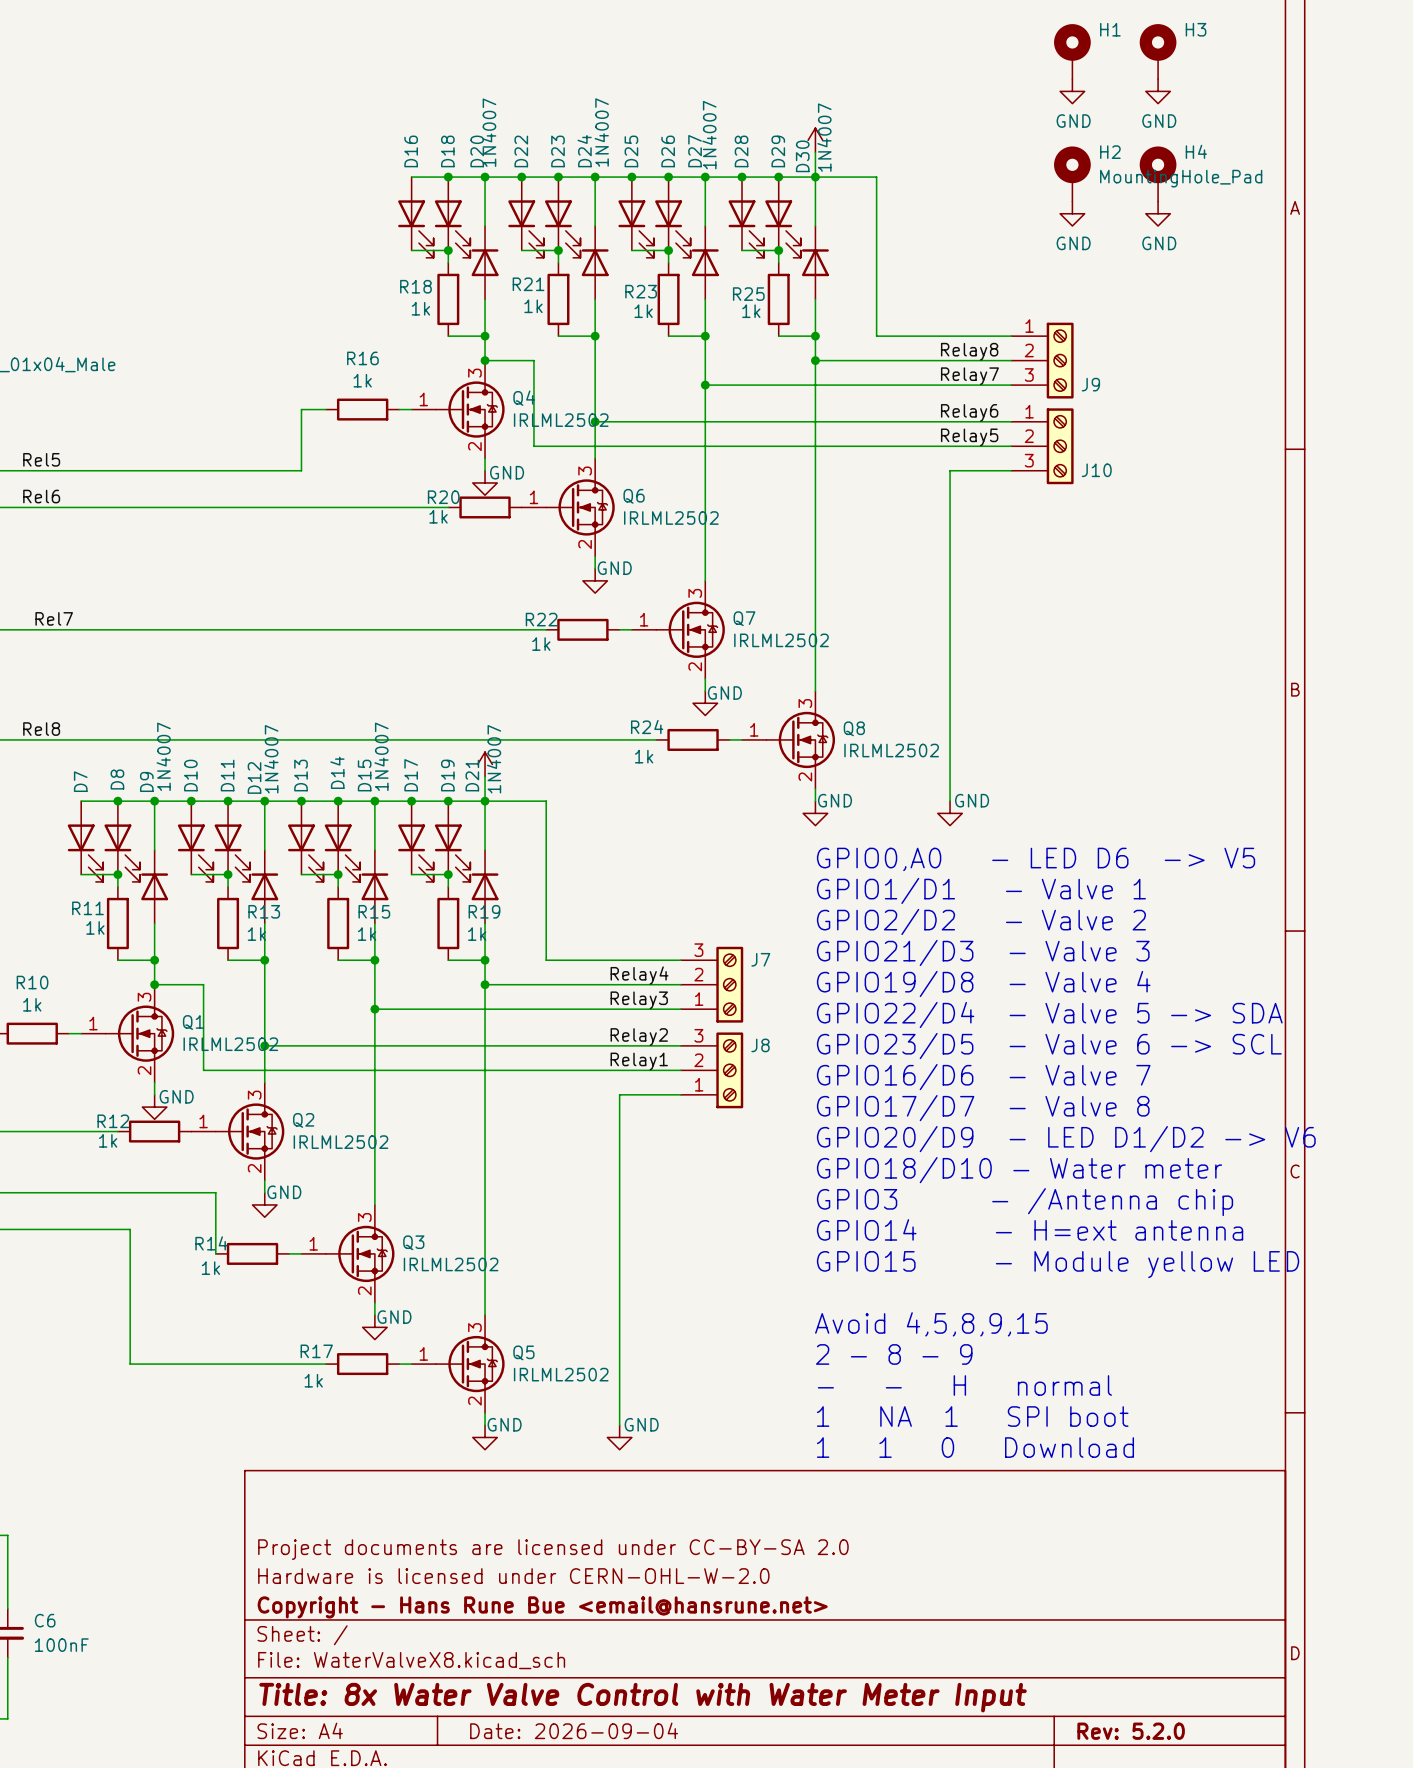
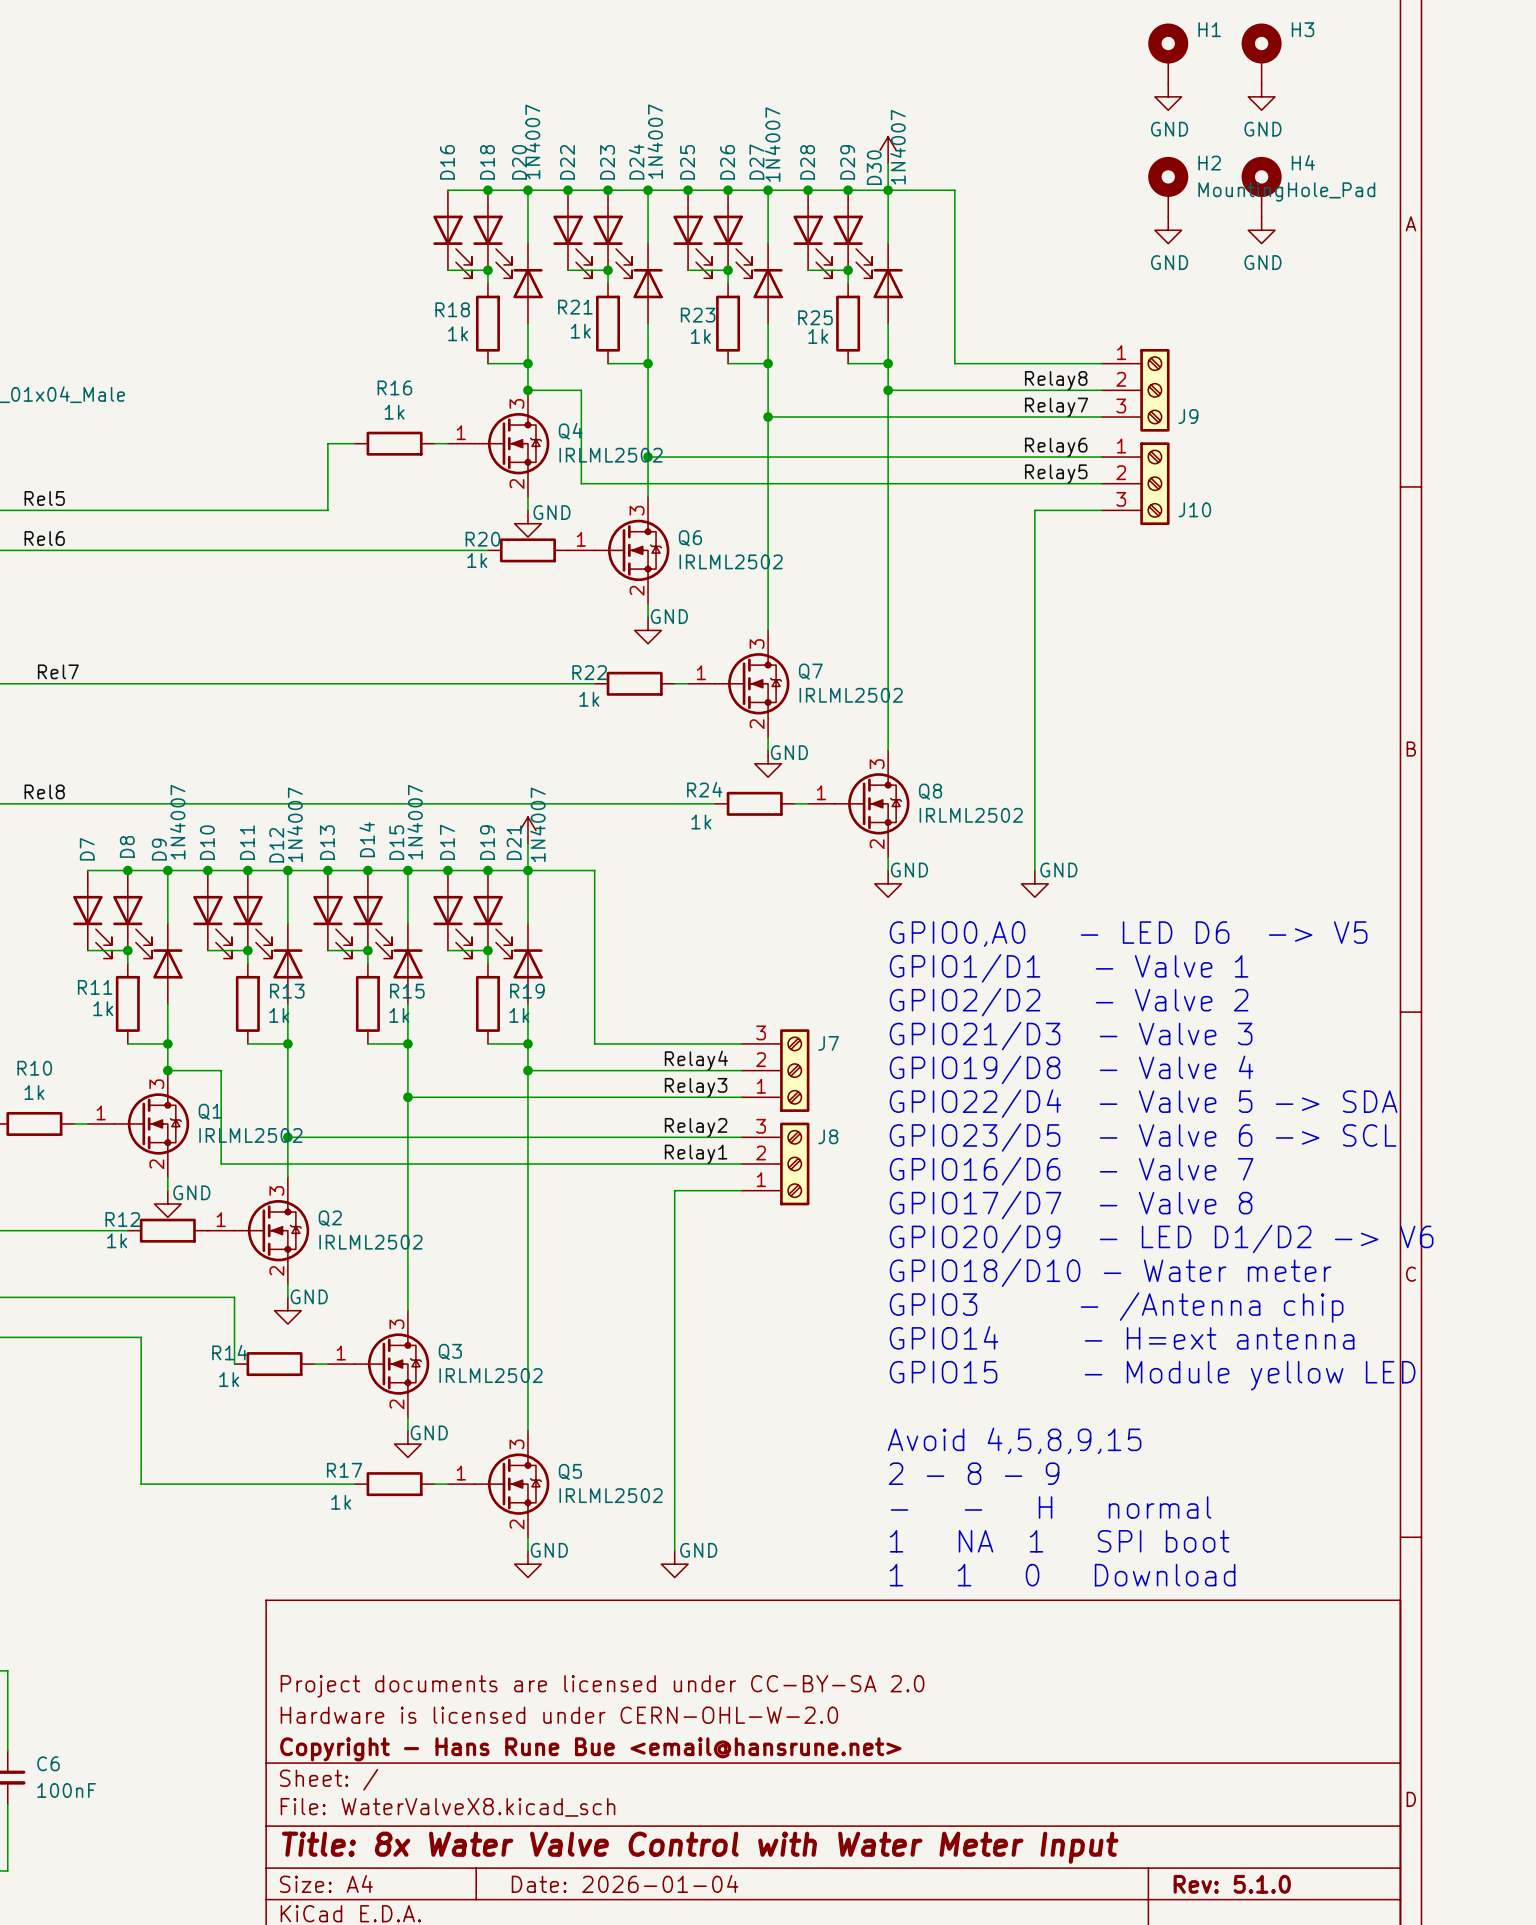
title block: Date: 2026-09-04 (574, 1730) -> Date: 2026-01-04 (625, 1883)
title block: Rev: 5.2.0 (1131, 1731) -> Rev: 5.1.0 (1232, 1884)

